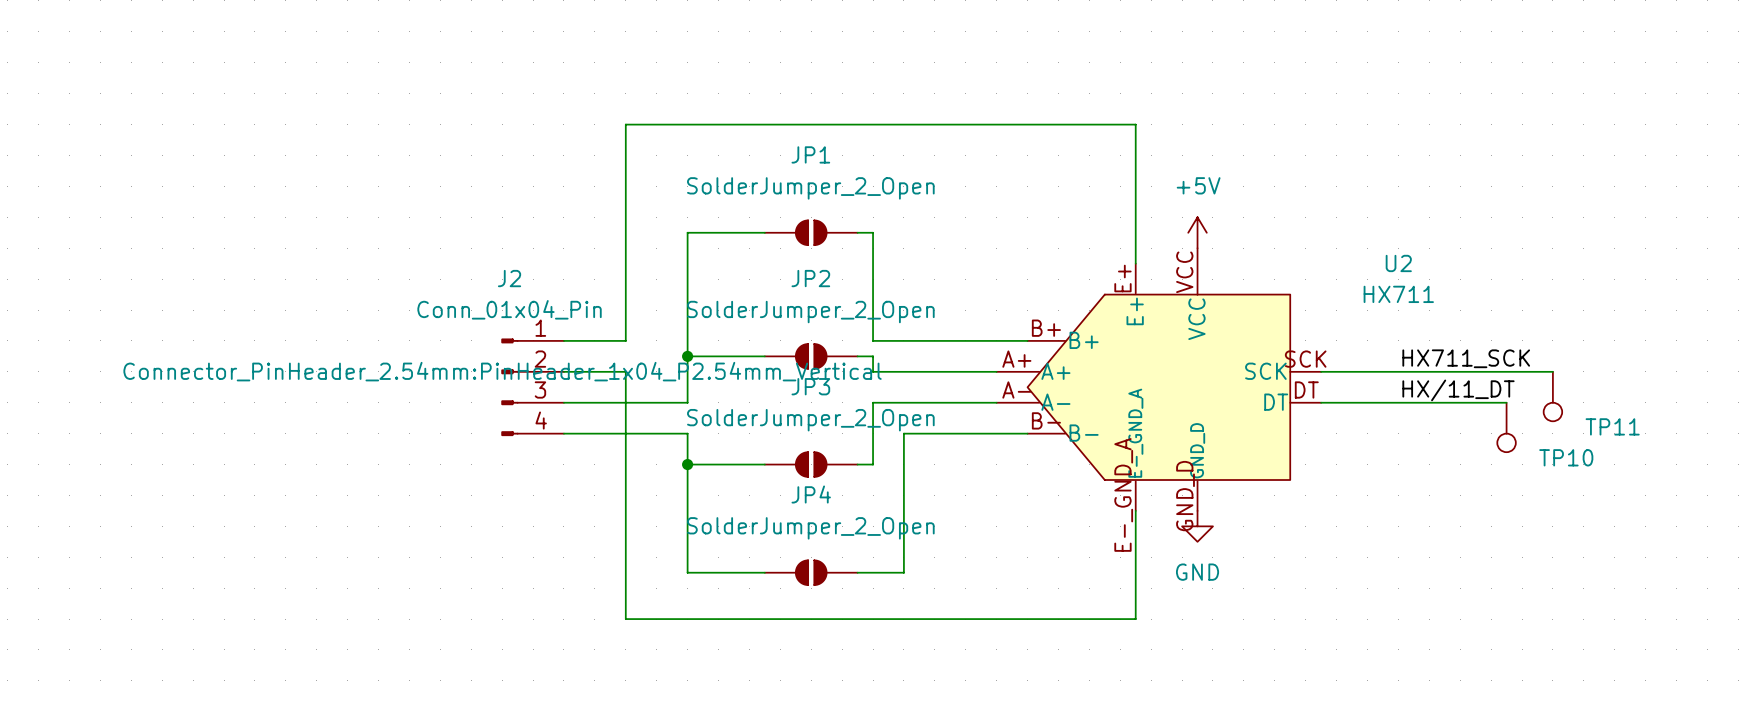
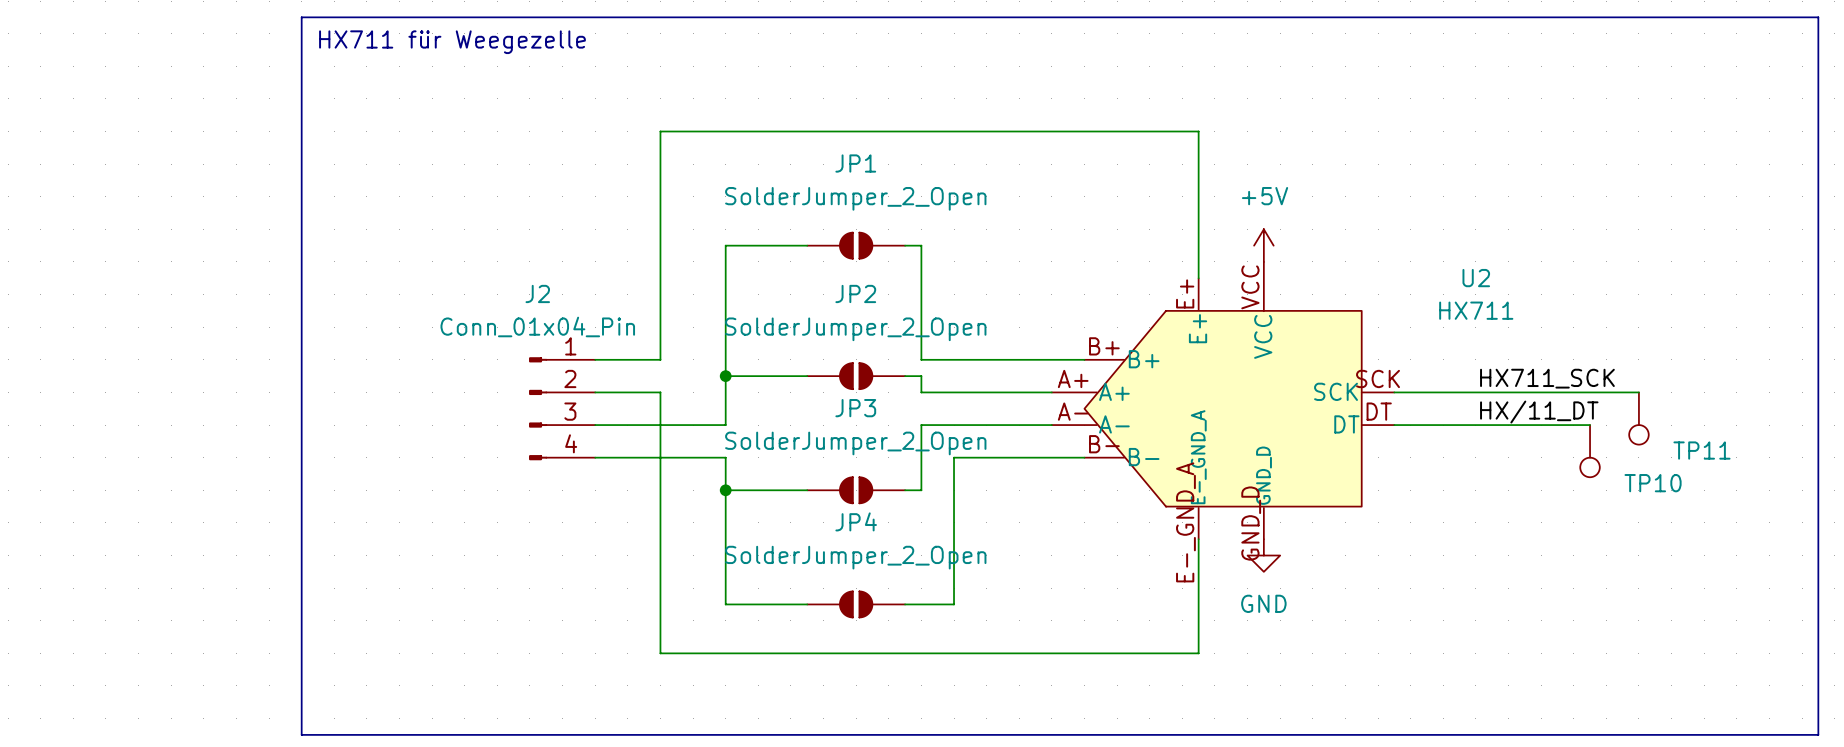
line: none -> (301, 17) (1818, 17) (1818, 734) (301, 734) (301, 17)
text: none -> HX711 für Weegezelle (452, 42)
J2 text: Connector_PinHeader_2.54mm:PinHeader_1x04_P2.54mm_Vertical (502, 371) -> none

